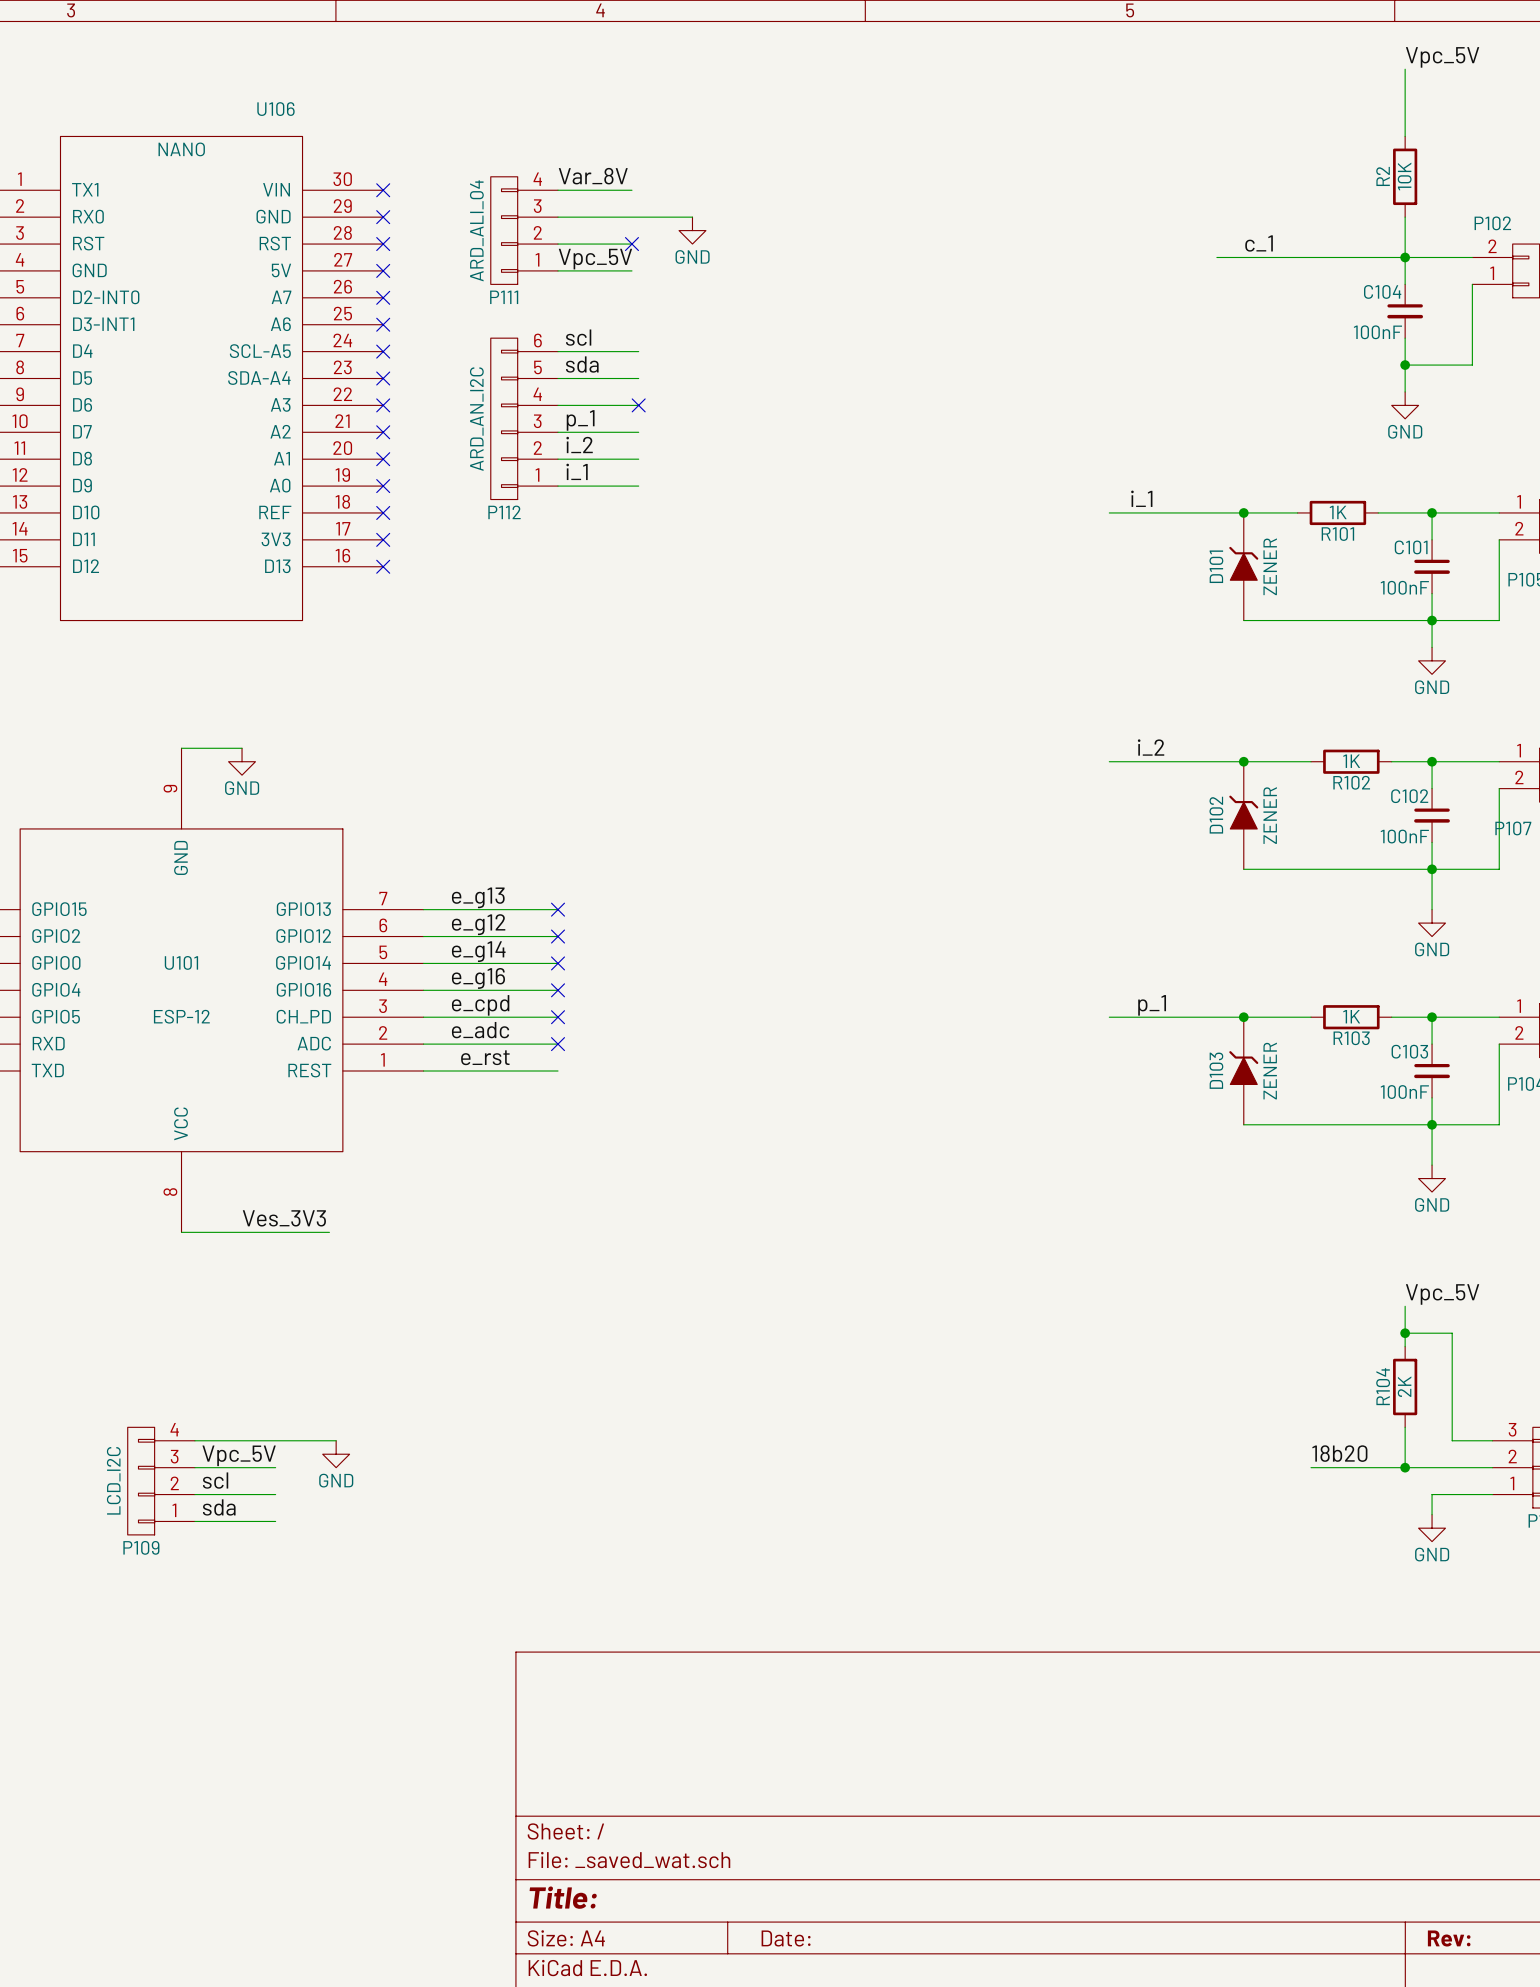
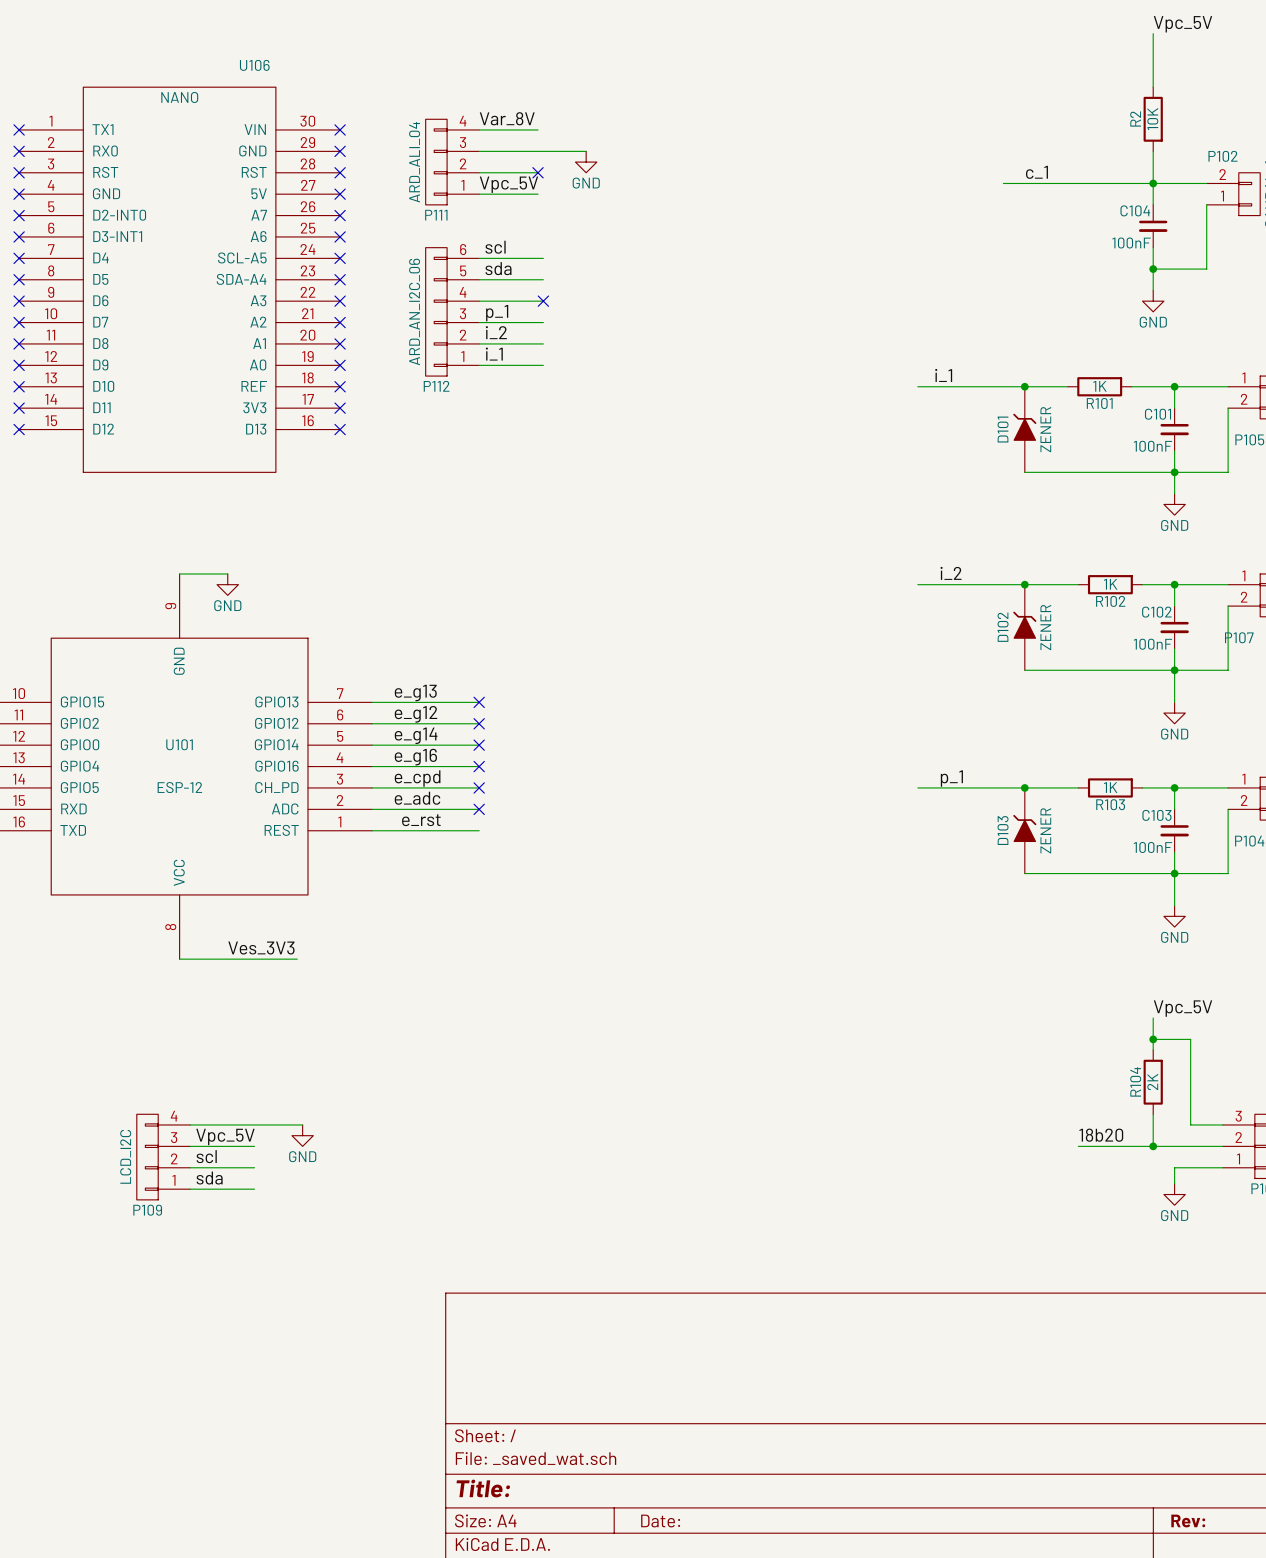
P112 value: ARD_AN_I2C (476, 419) -> ARD_AN_I2C_06 (414, 311)

